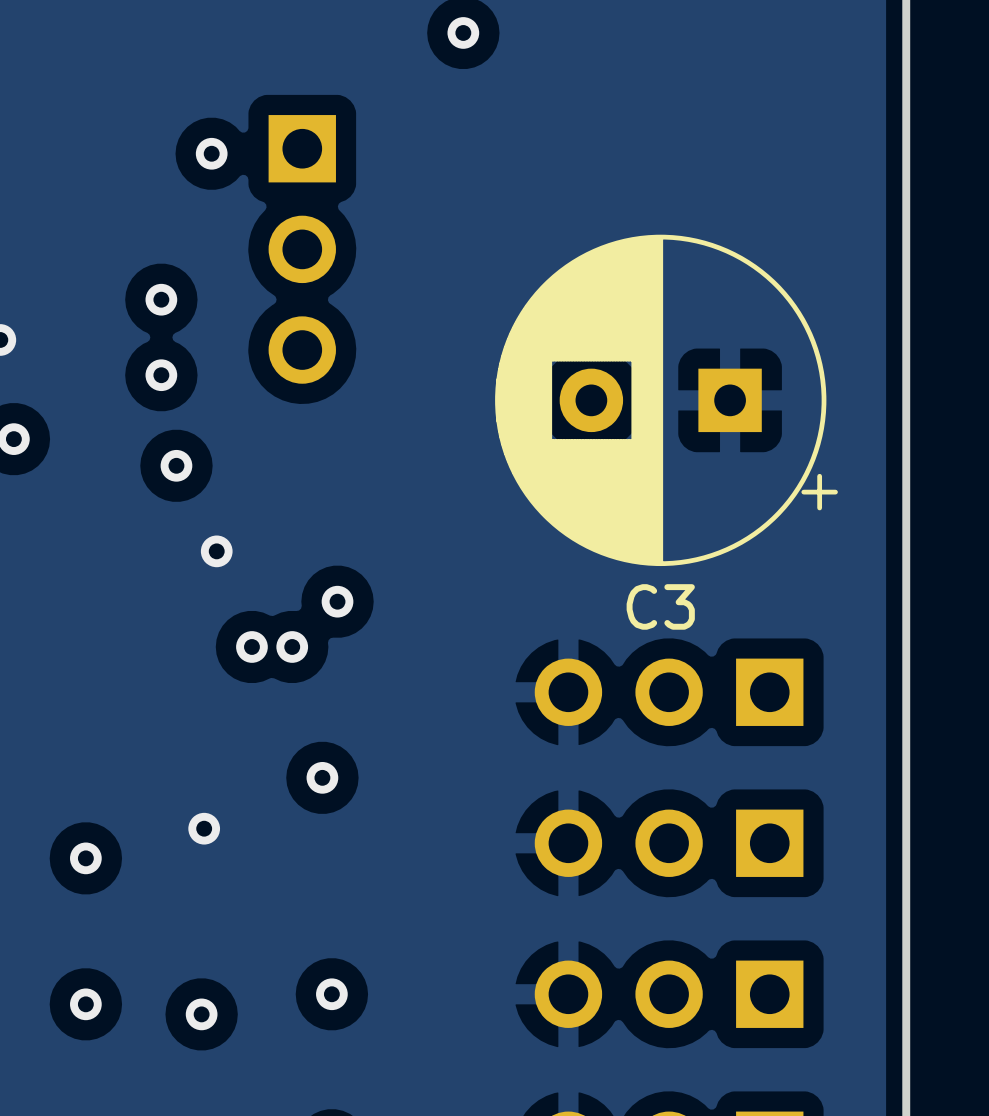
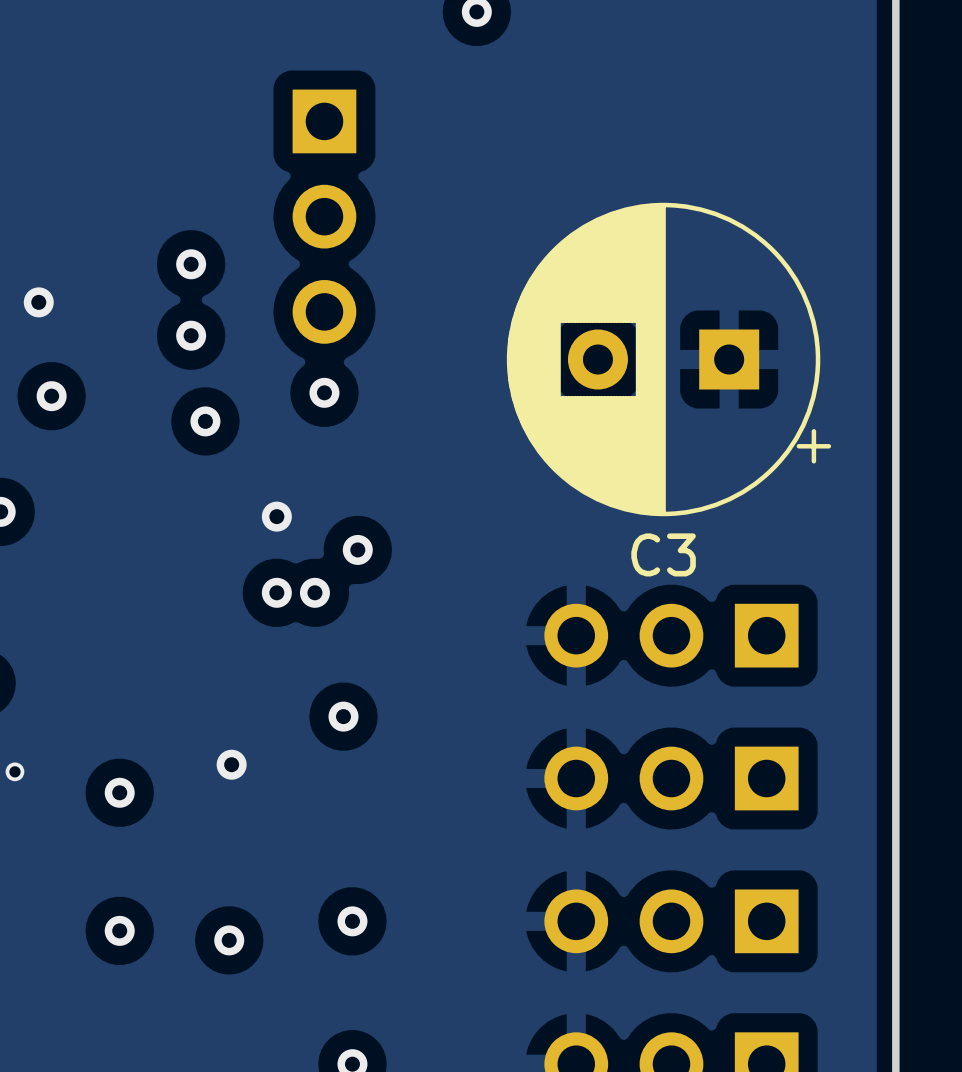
via: (211, 153) -> none
via: none -> (324, 392)
via position: (216, 551) -> (276, 516)

